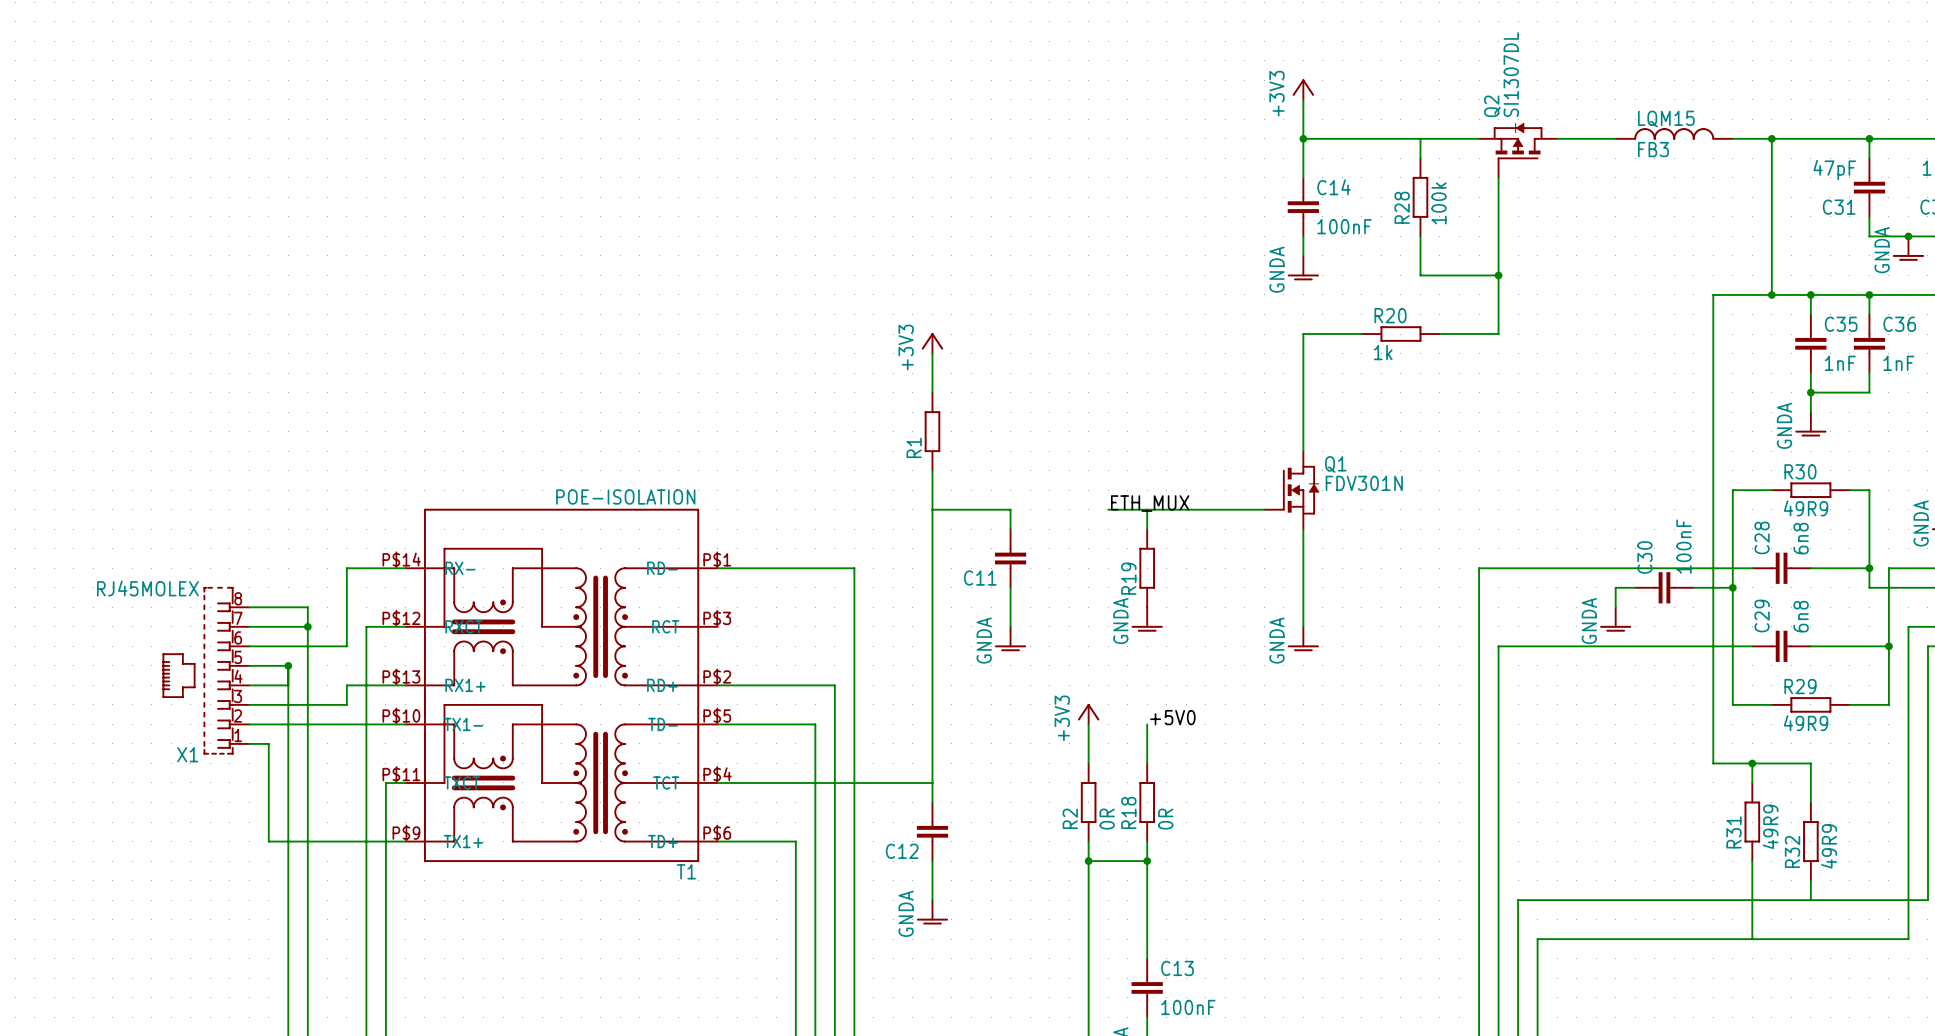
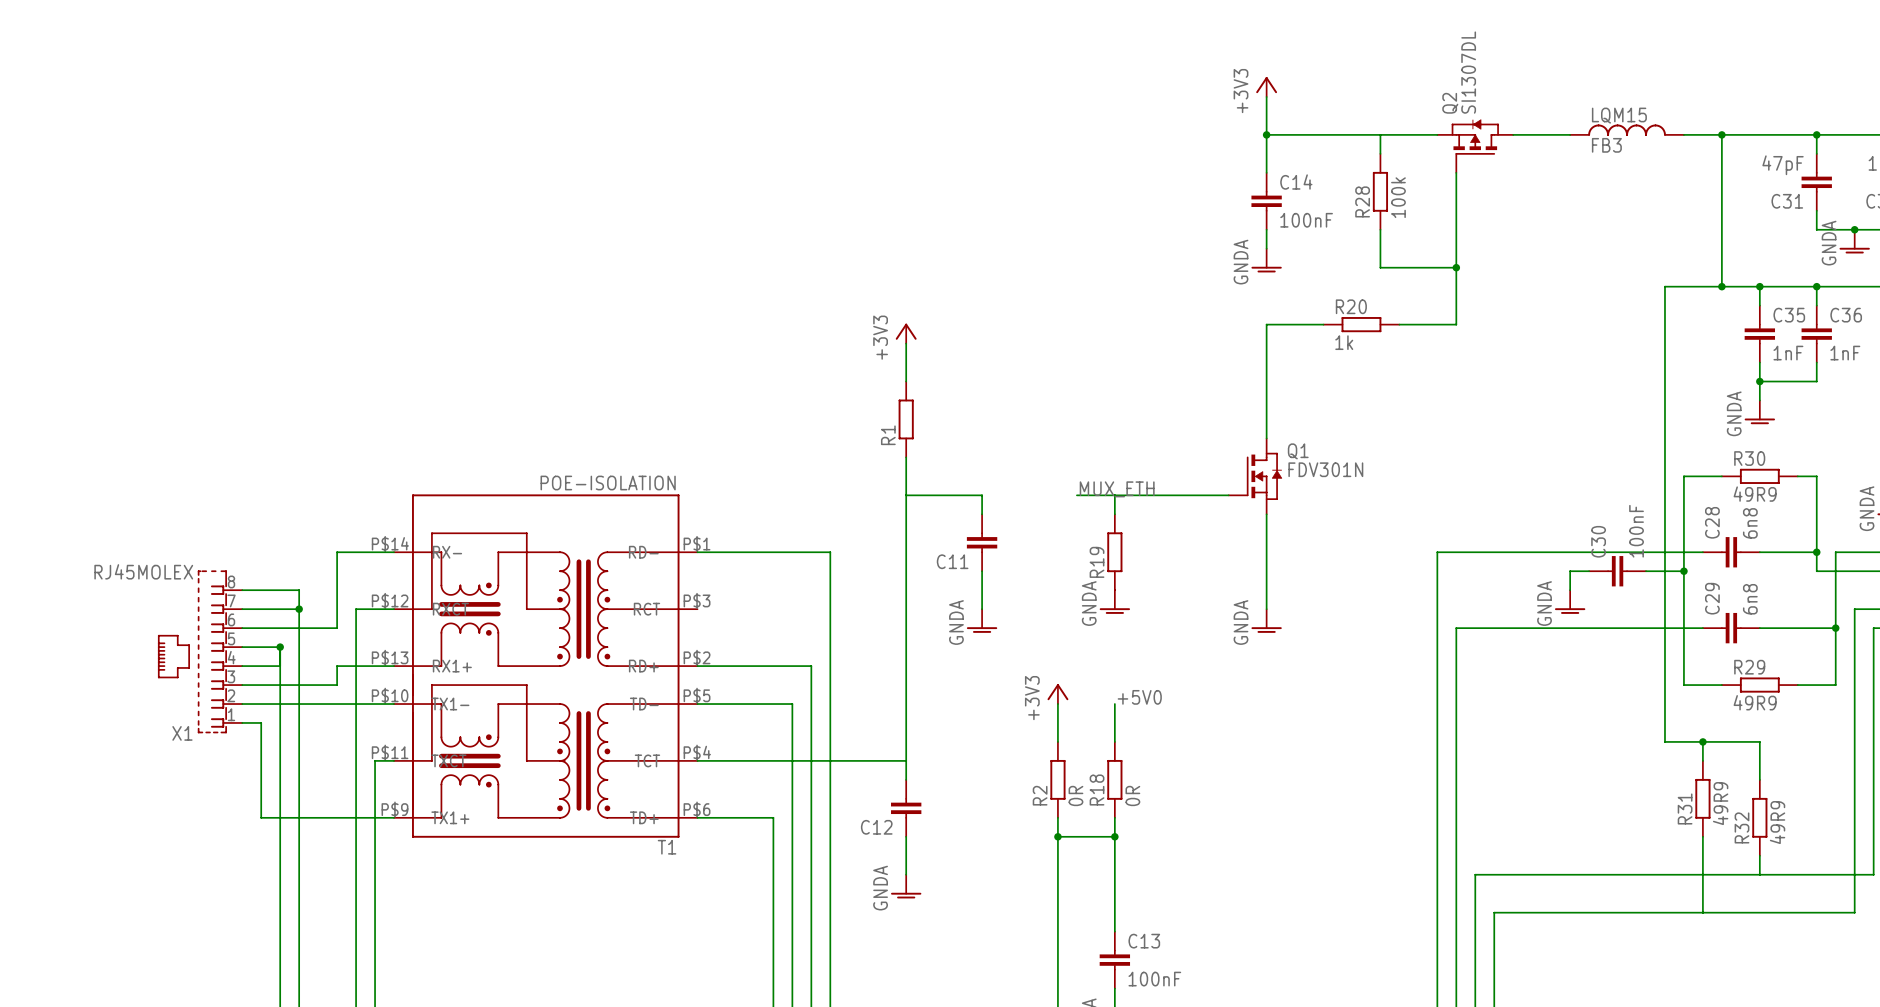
label: ETH_MUX (1150, 503) -> MUX_ETH (1117, 489)

